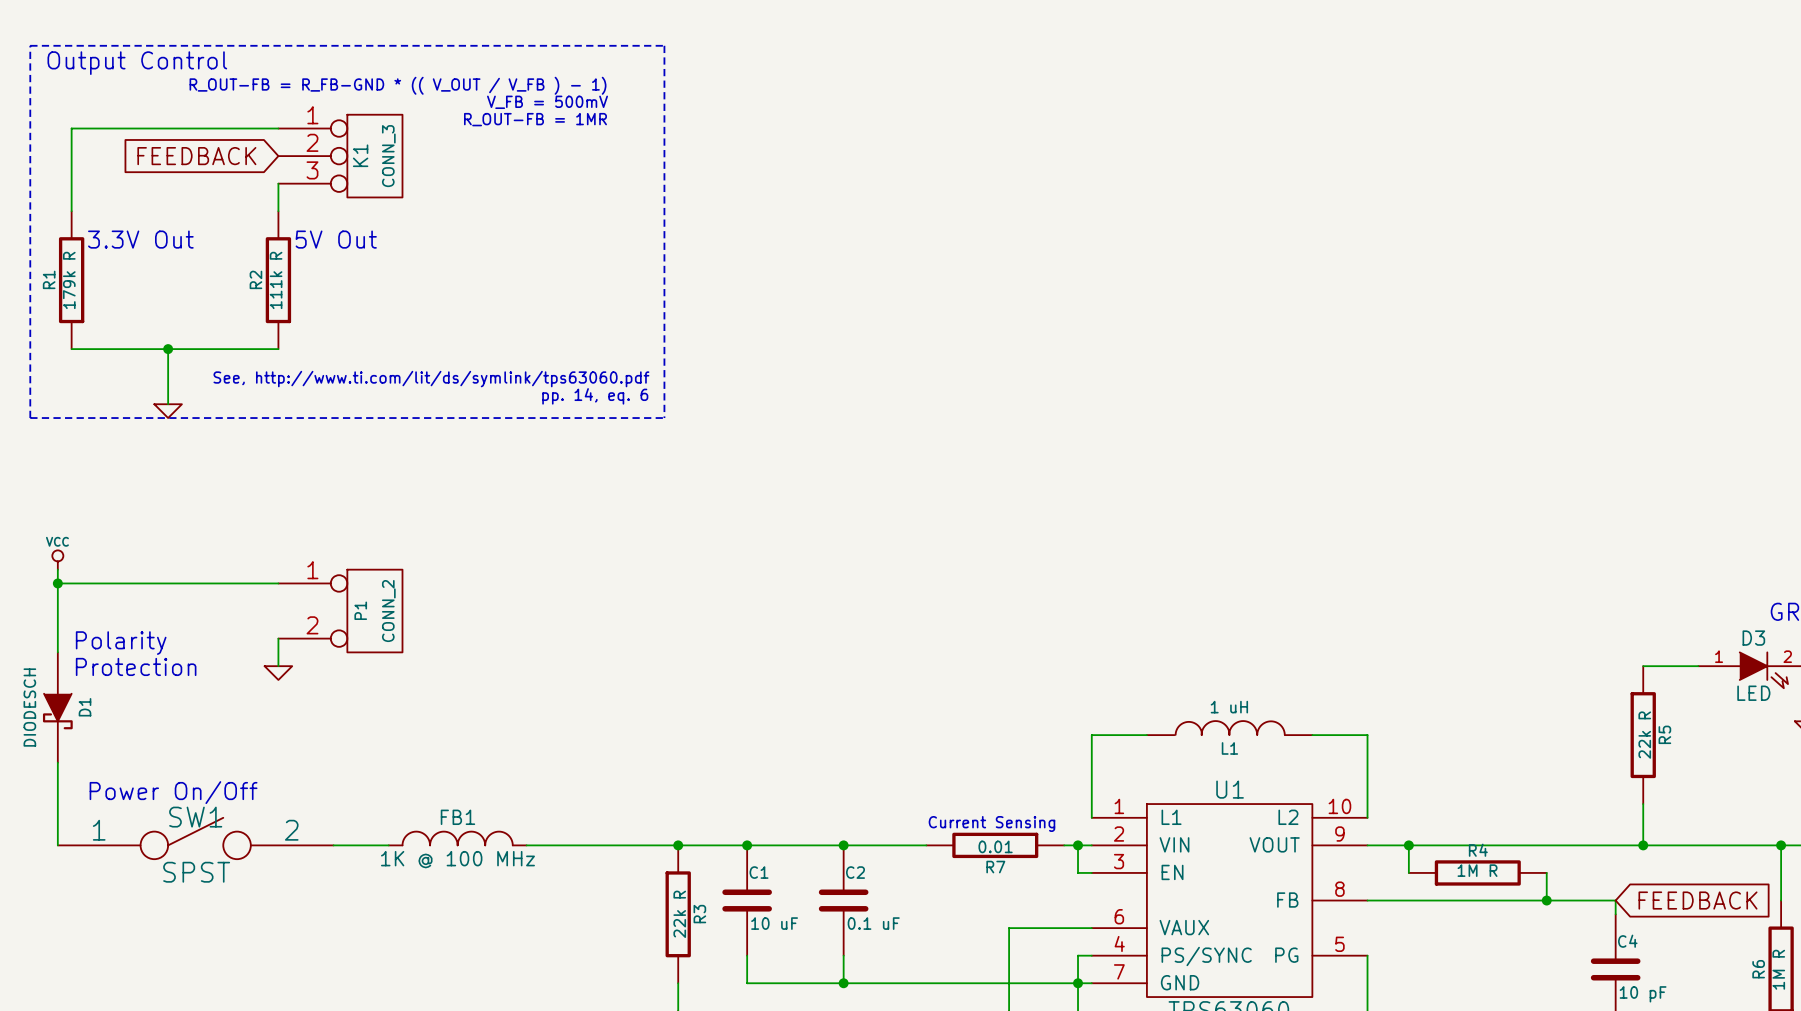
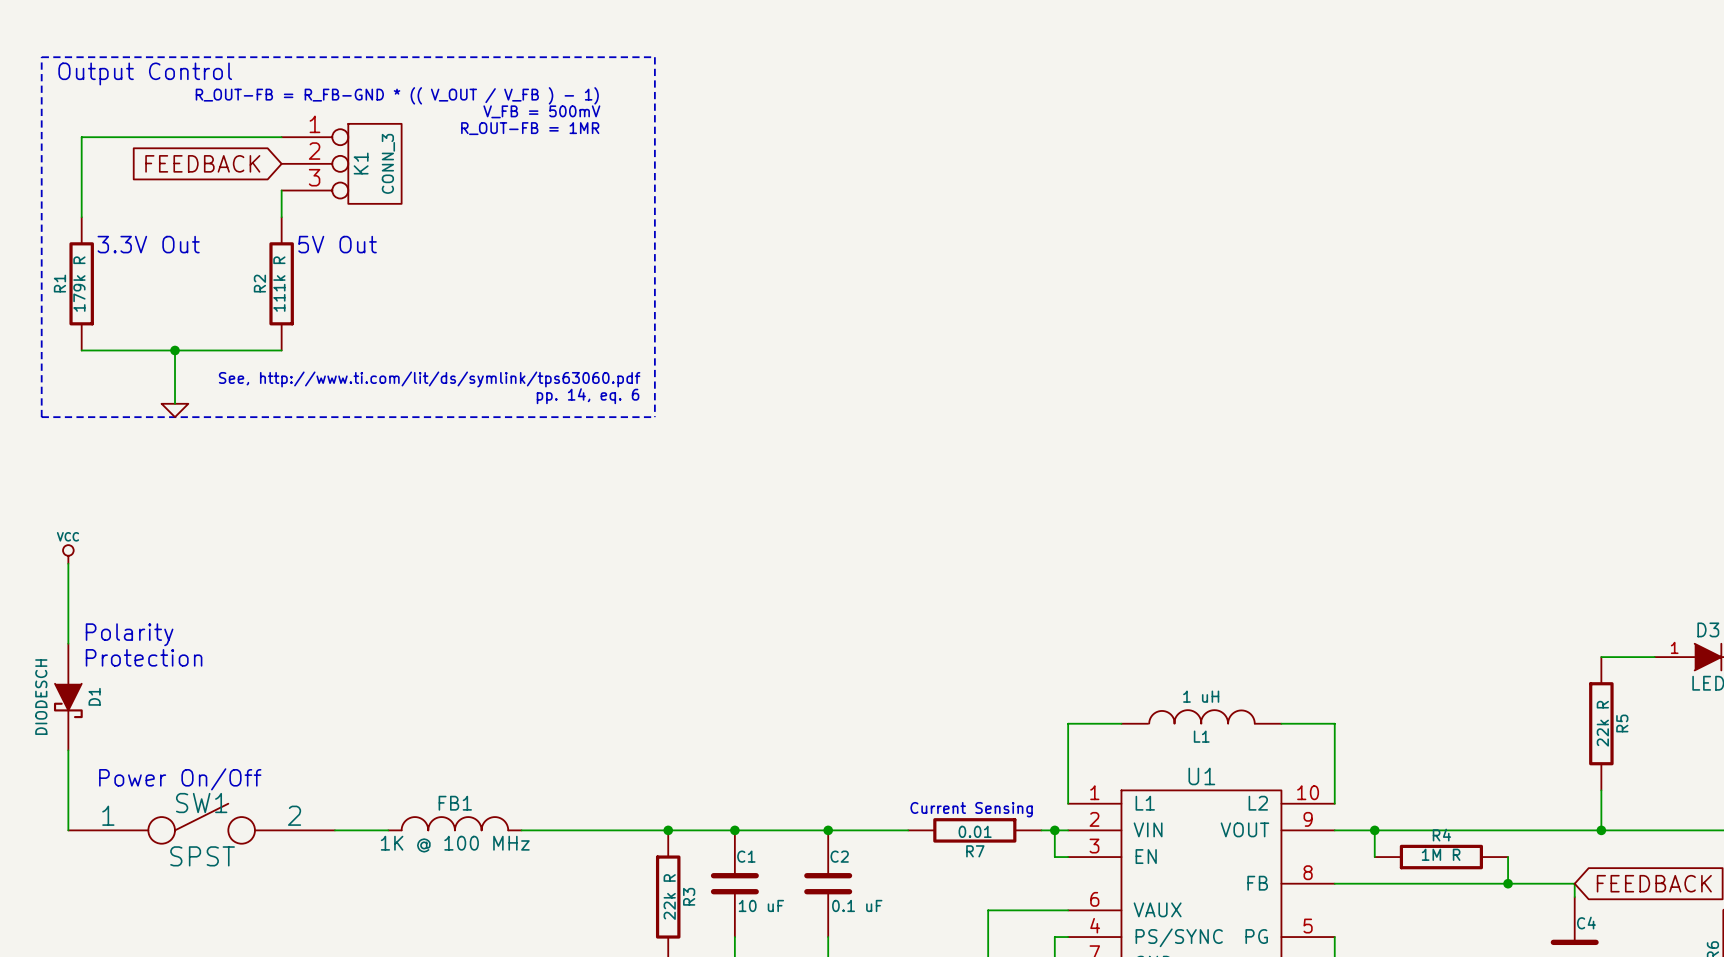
wire: (57, 583) (278, 583) -> none
junction: (57, 583) -> none
P1: CONN_2 (340, 611) -> none
wire: (278, 638) (278, 666) -> none
power symbol: (278, 673) -> none

